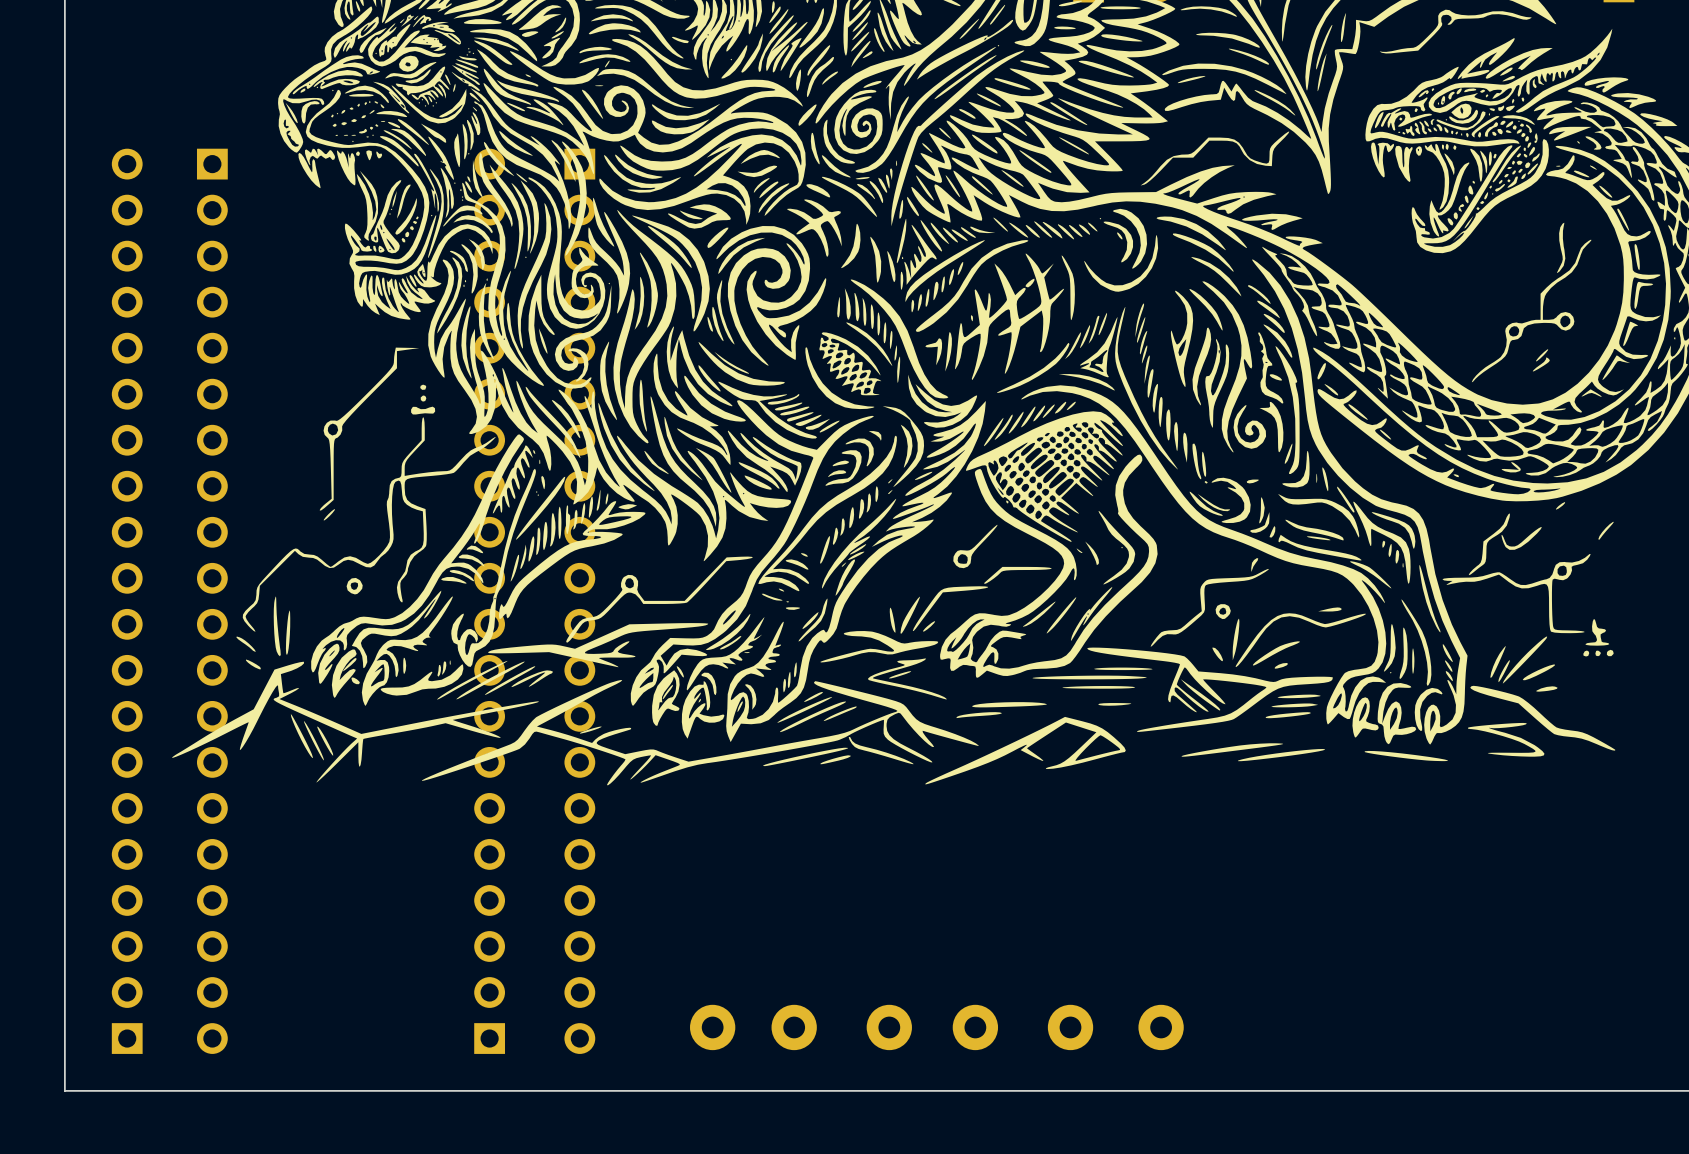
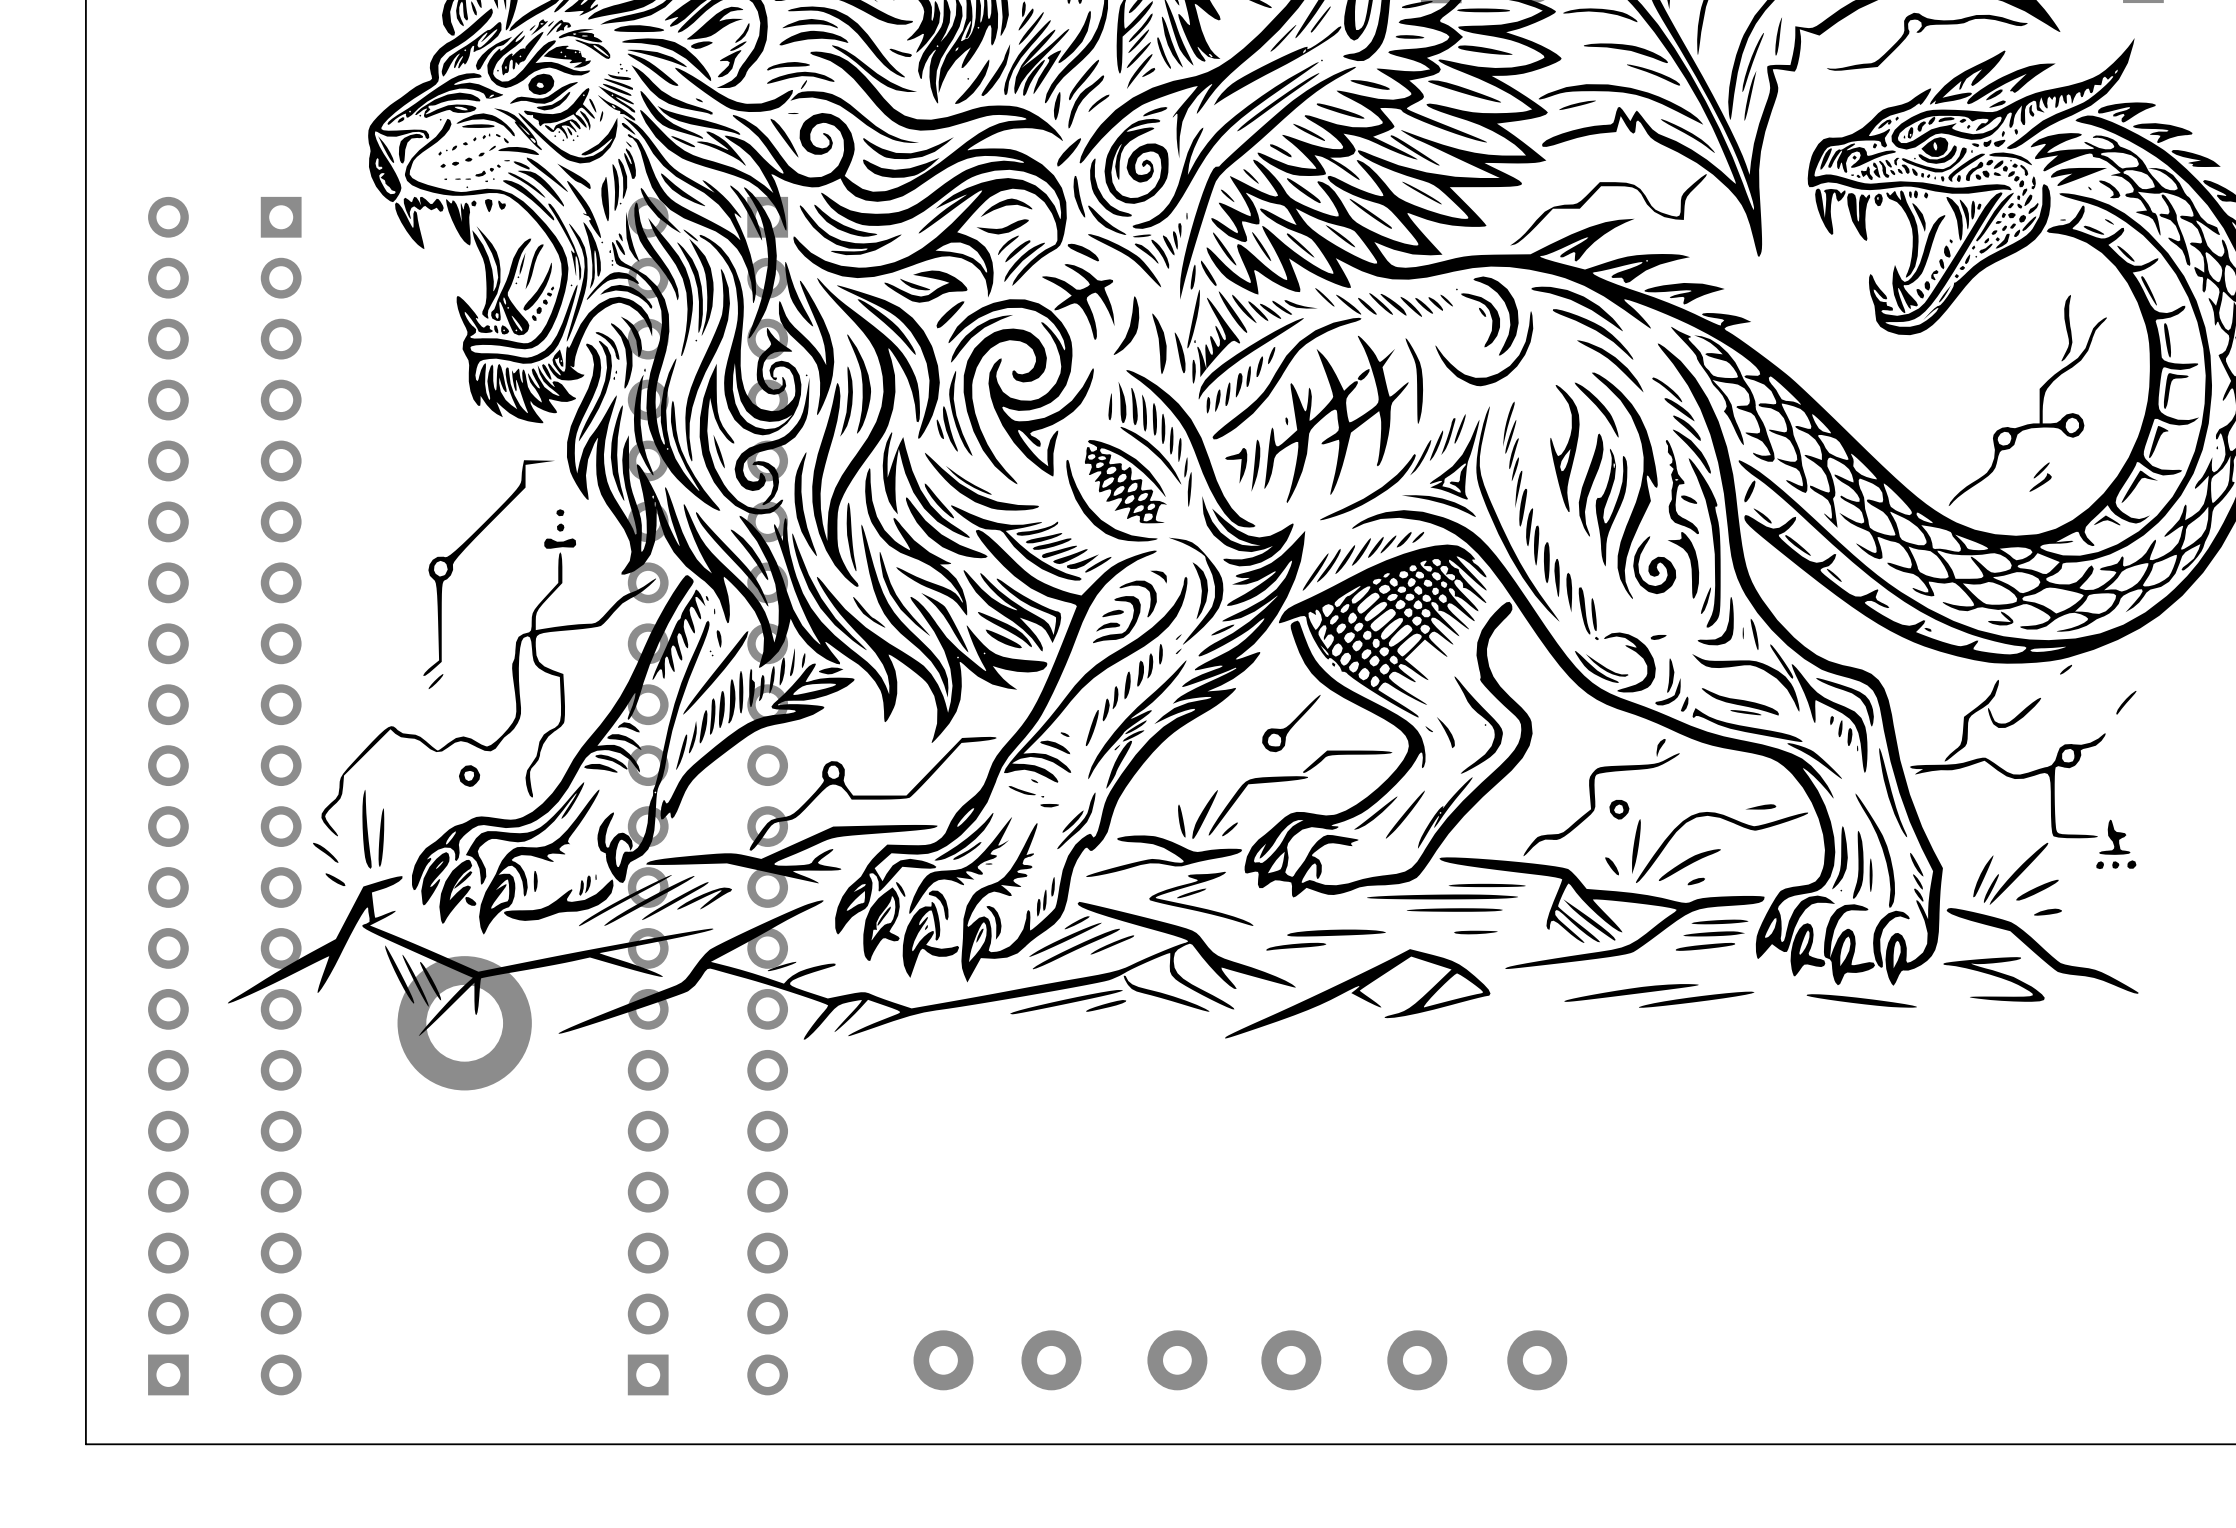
part: none -> (464, 1023)

